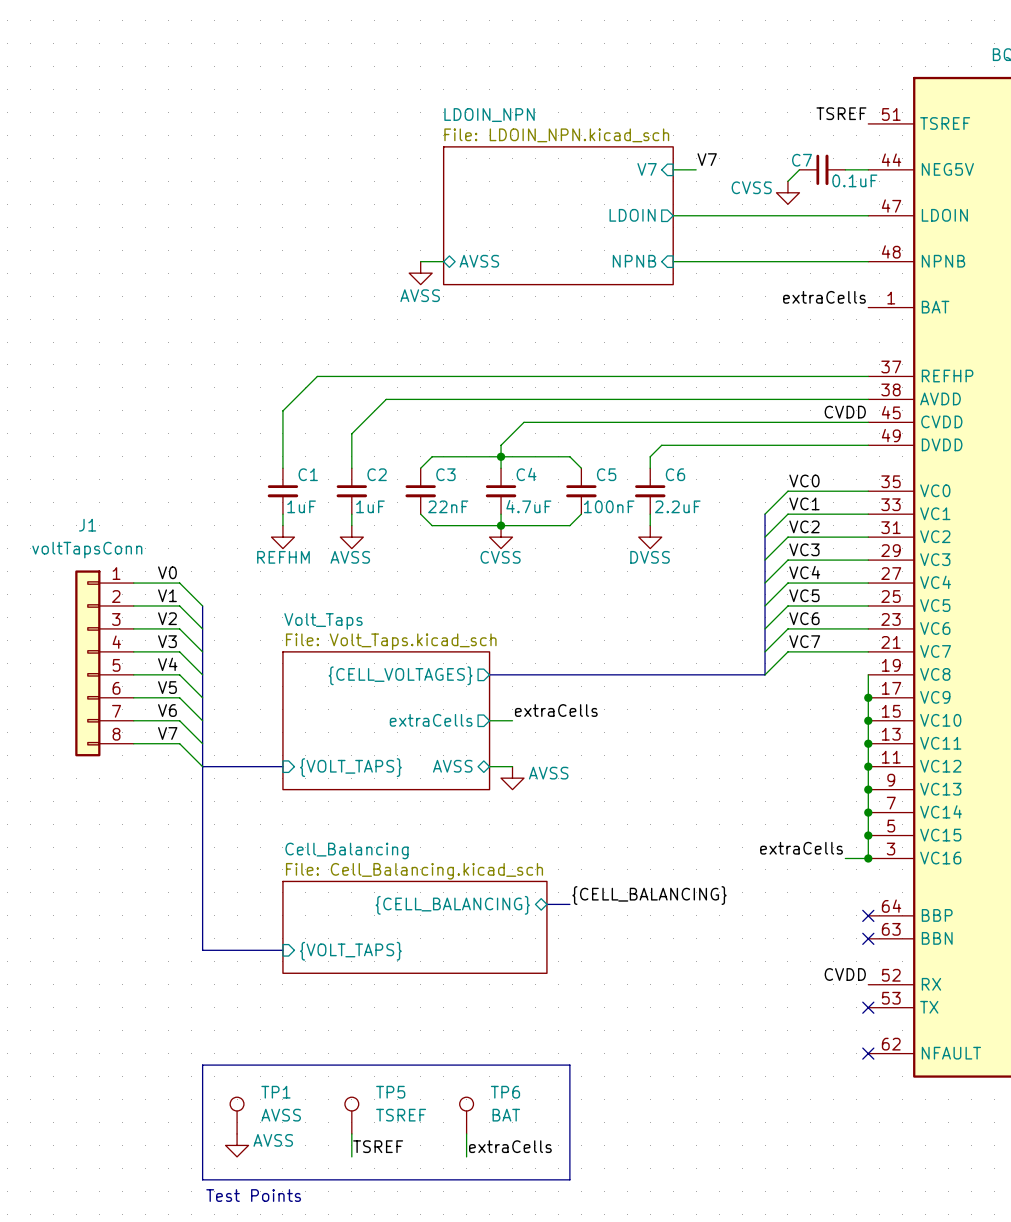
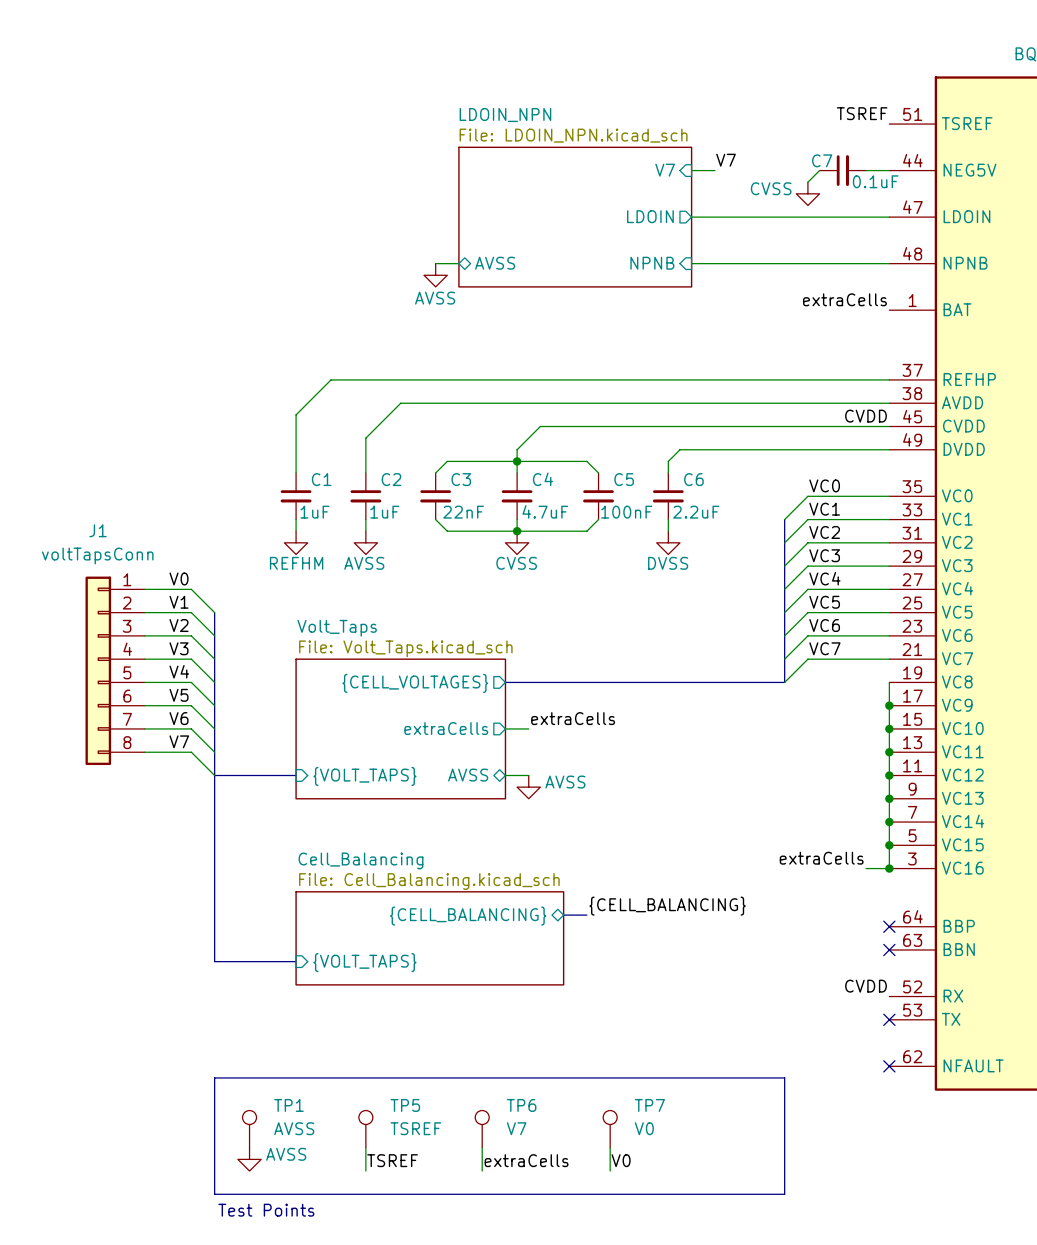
line: (569, 1065) (569, 1179) -> (586, 1077) (784, 1077) (784, 1194) (586, 1194)
TP6 value: BAT (506, 1115) -> V7 (516, 1128)
TP7: none -> V0 (610, 1129)
wire: none -> (610, 1147) (610, 1171)
label: none -> V0 (621, 1160)

